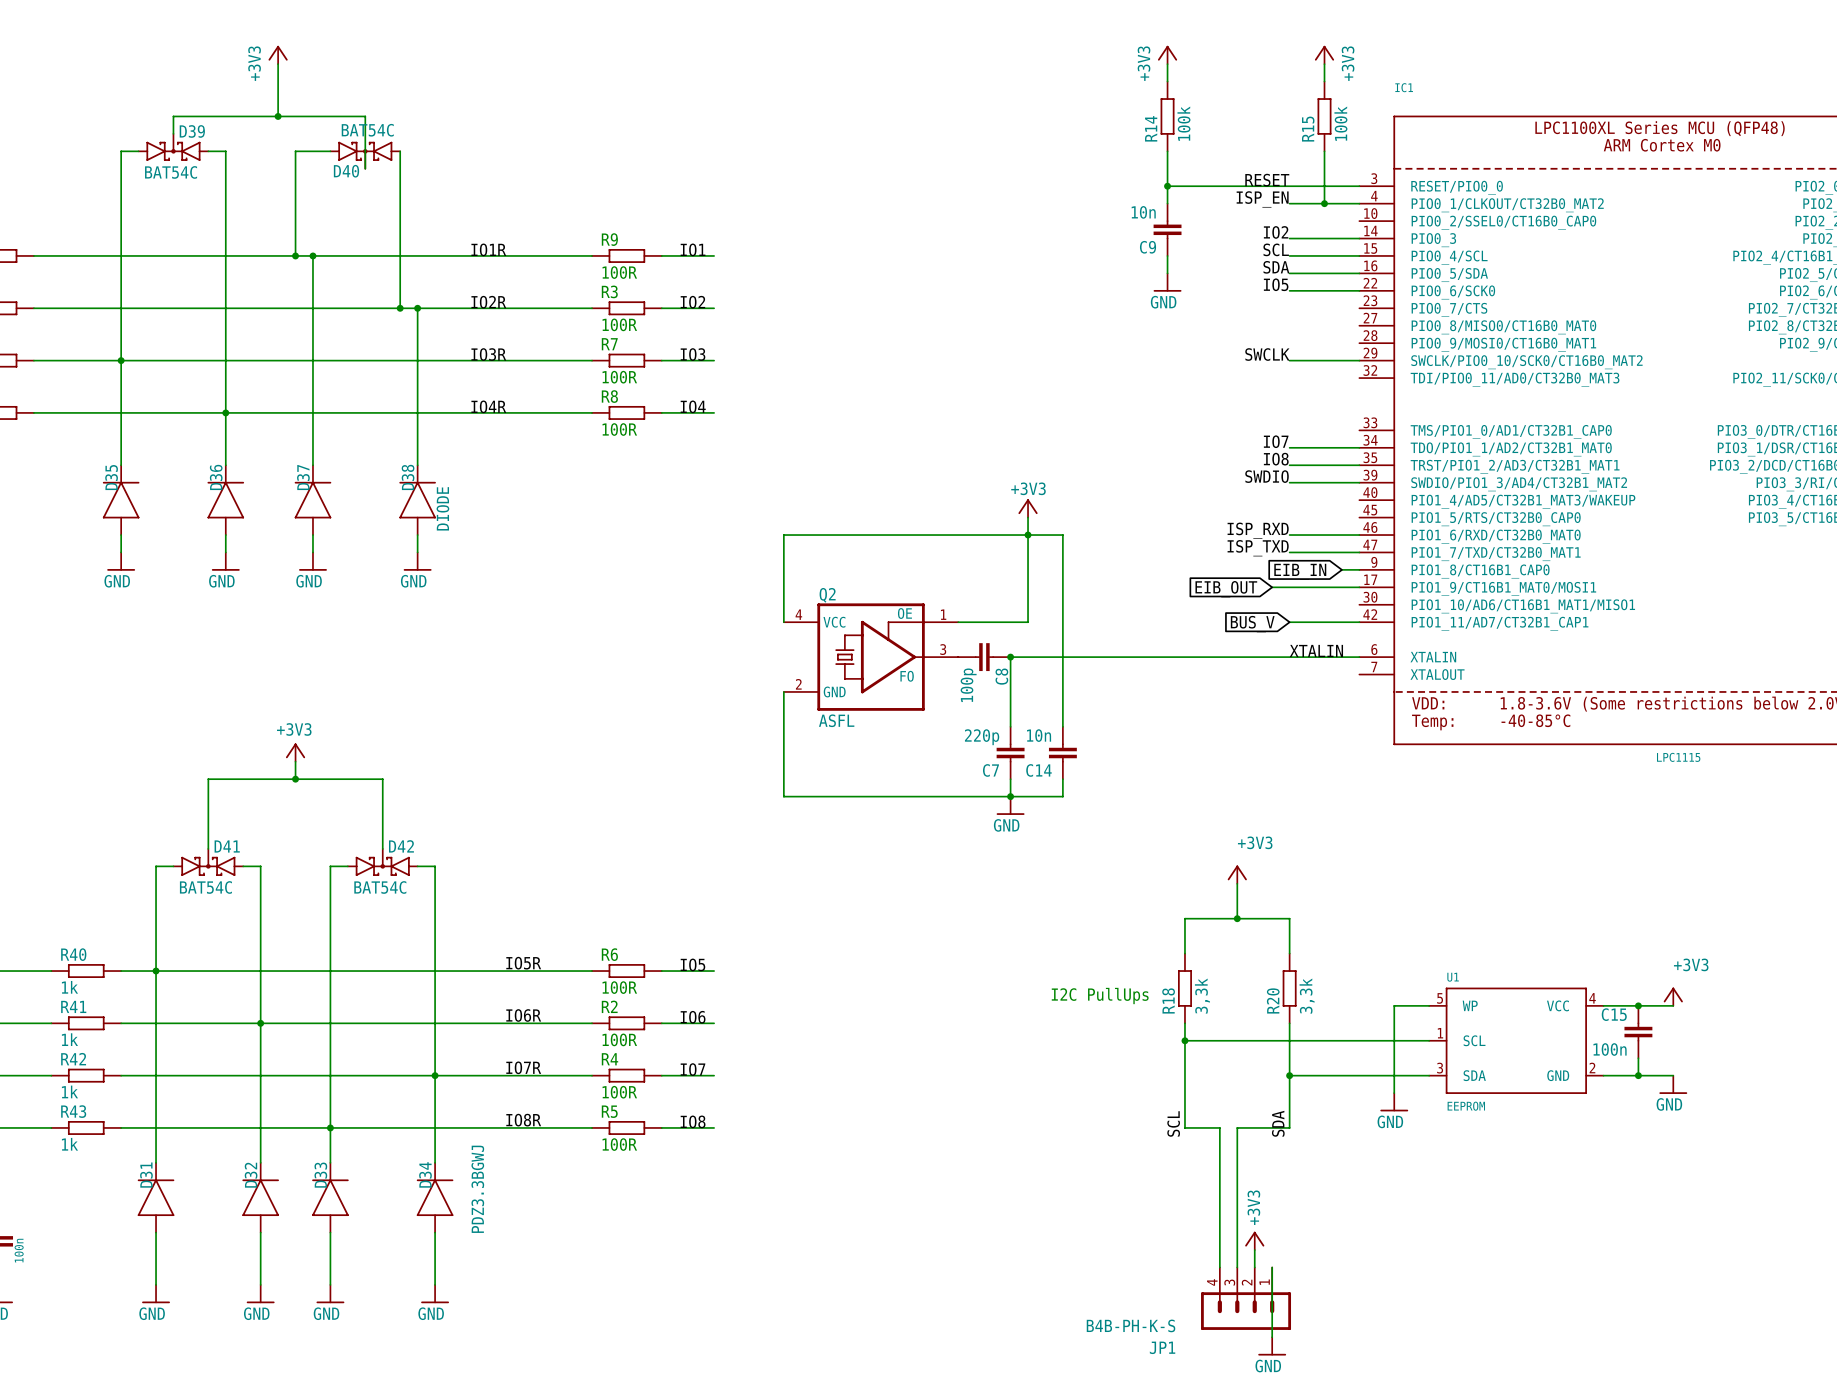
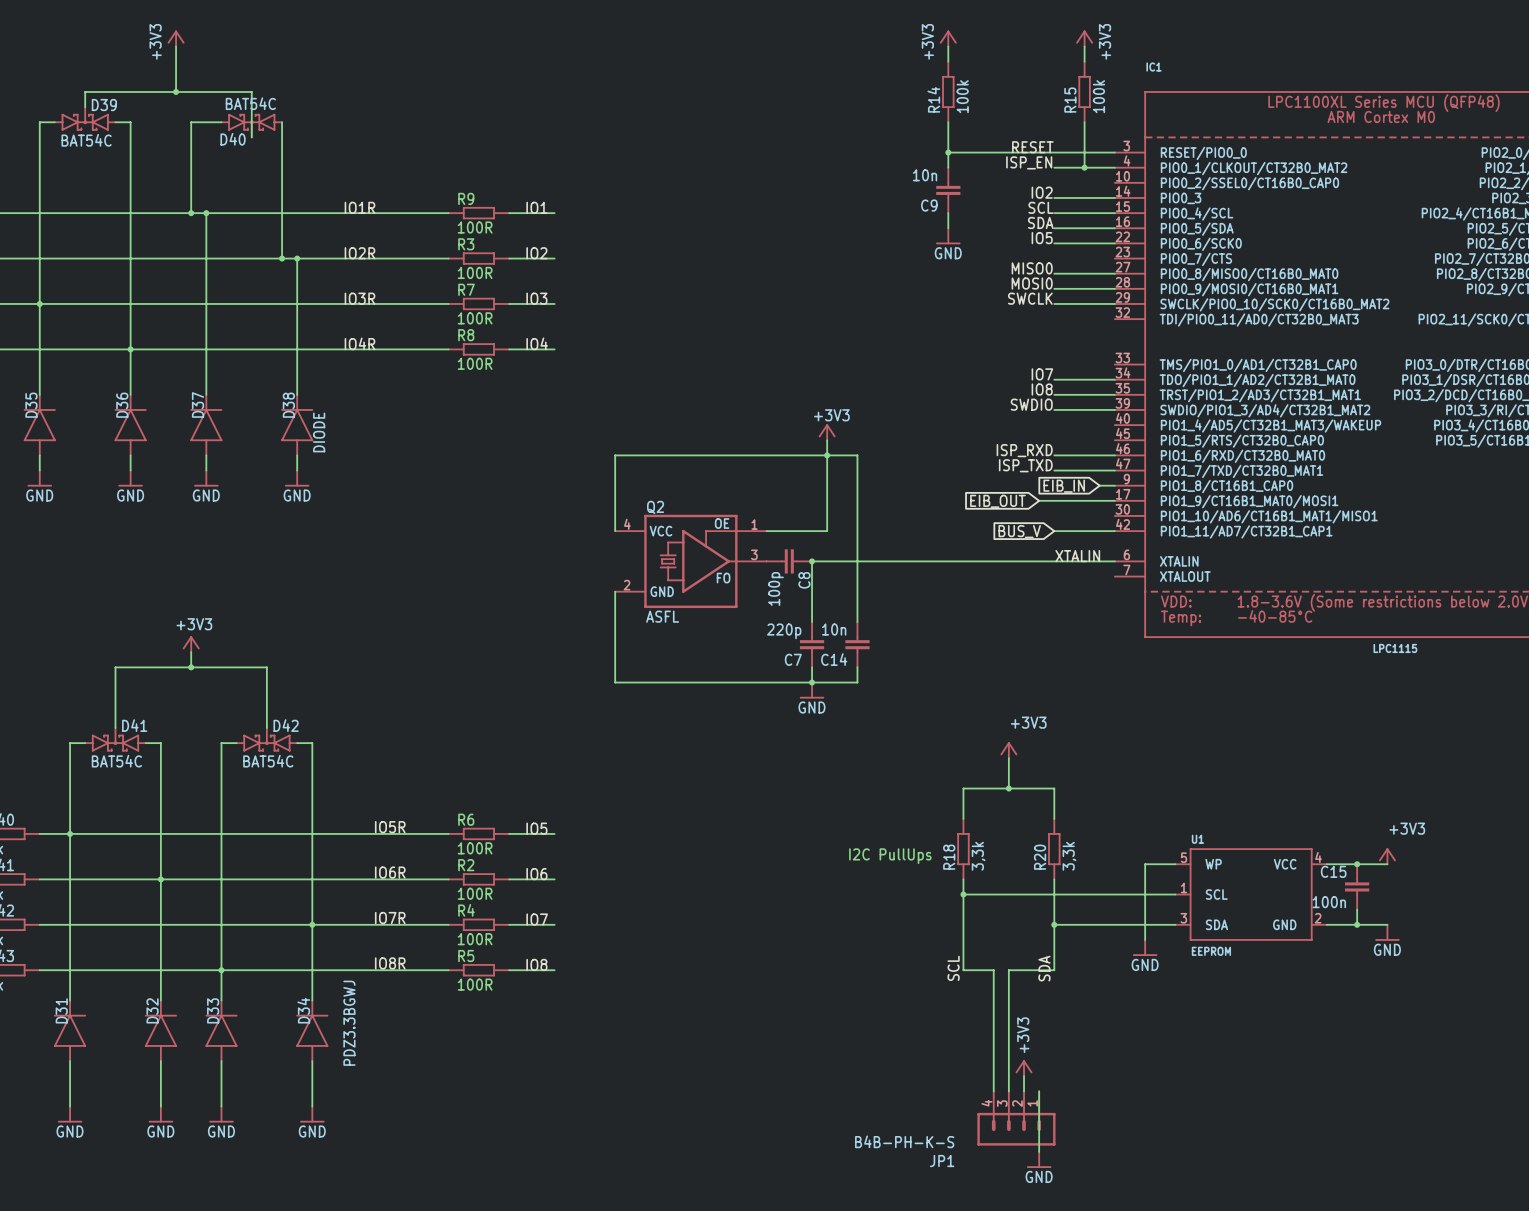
label: none -> MISO0 (1032, 268)
wire: none -> (1054, 273) (1114, 273)
label: none -> MOSI0 (1032, 283)
wire: none -> (1054, 288) (1114, 288)

